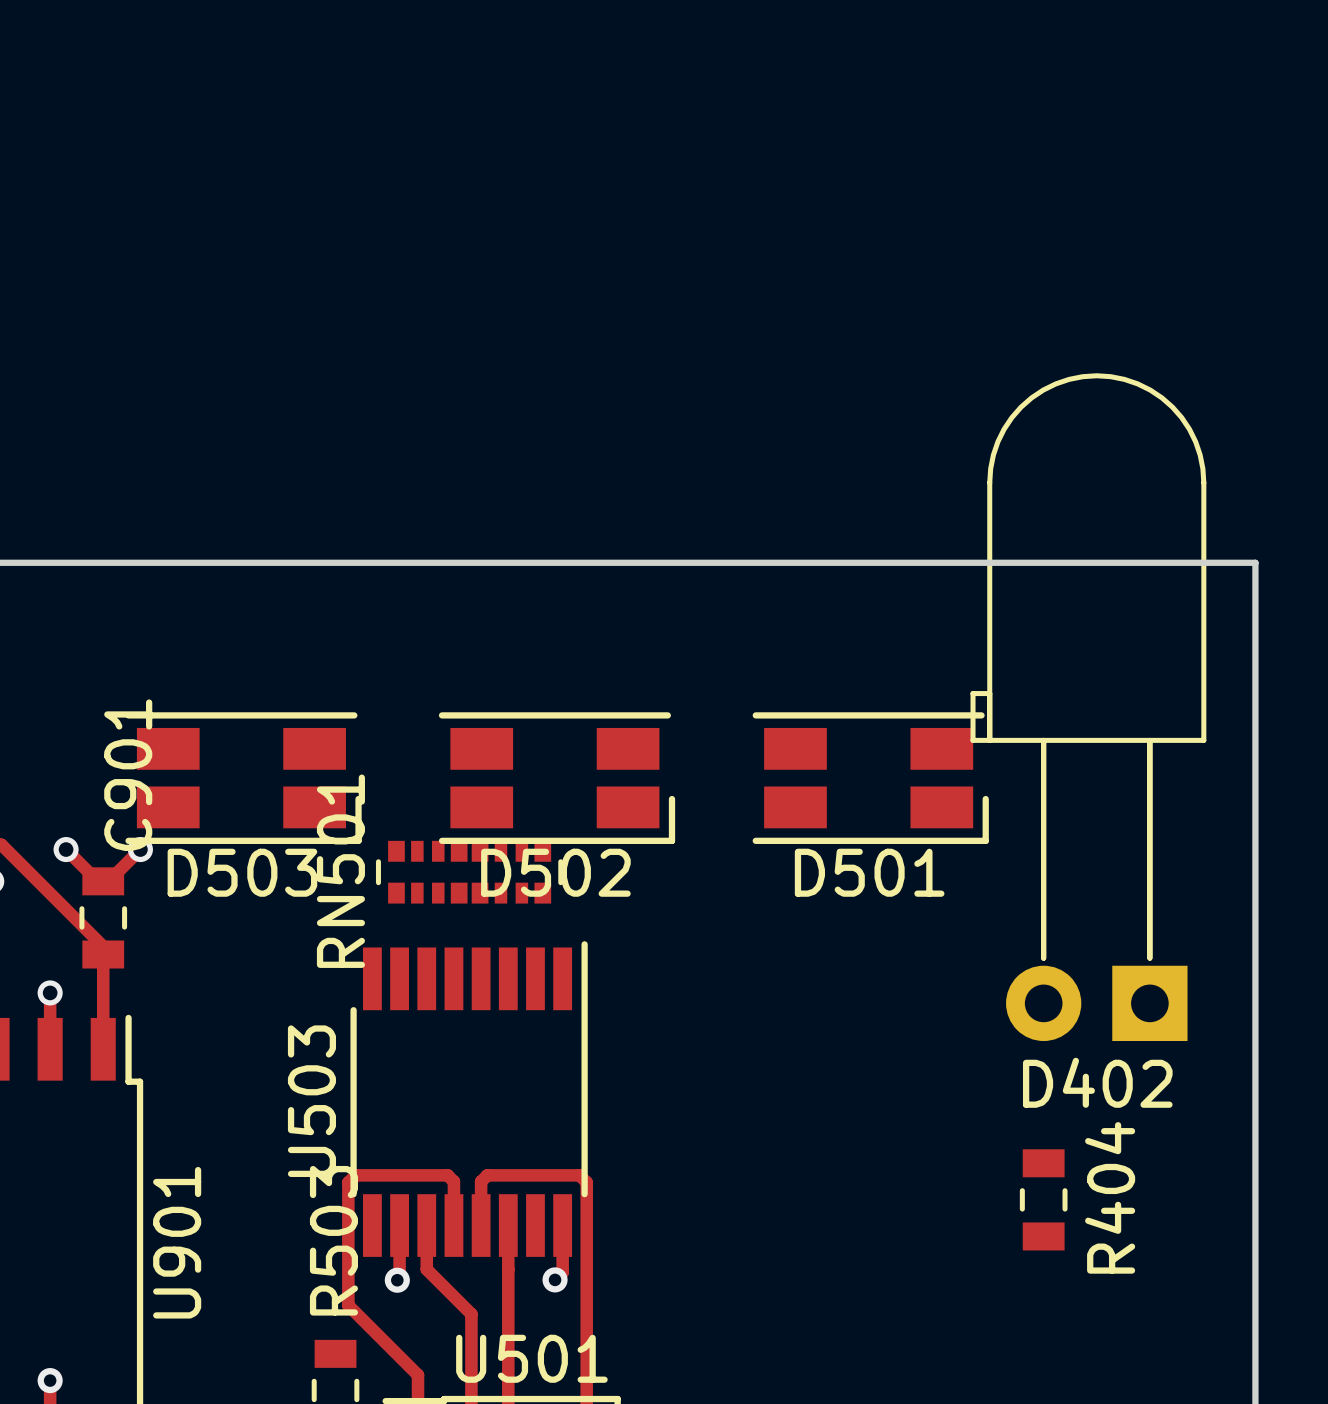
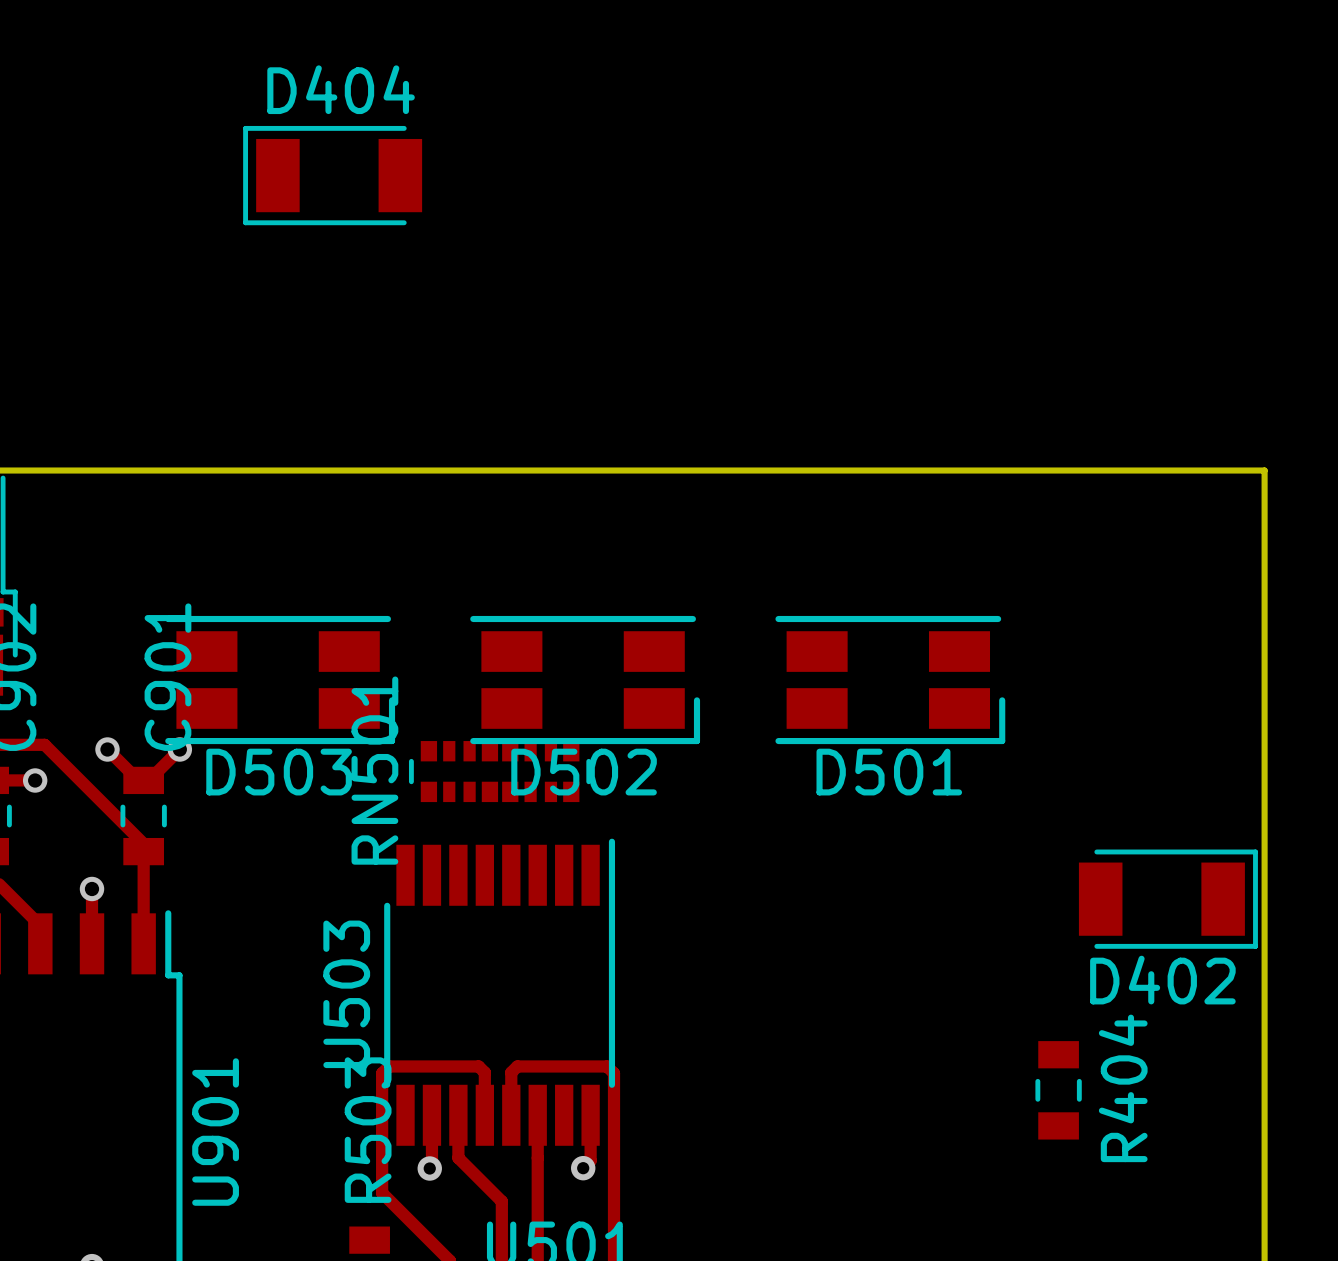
D404: none -> (332, 175)
D402 footprint: [970, 373, 1207, 1042] -> [1078, 849, 1258, 949]
D402 name position: D402 (1097, 1082) -> D402 (1162, 980)

